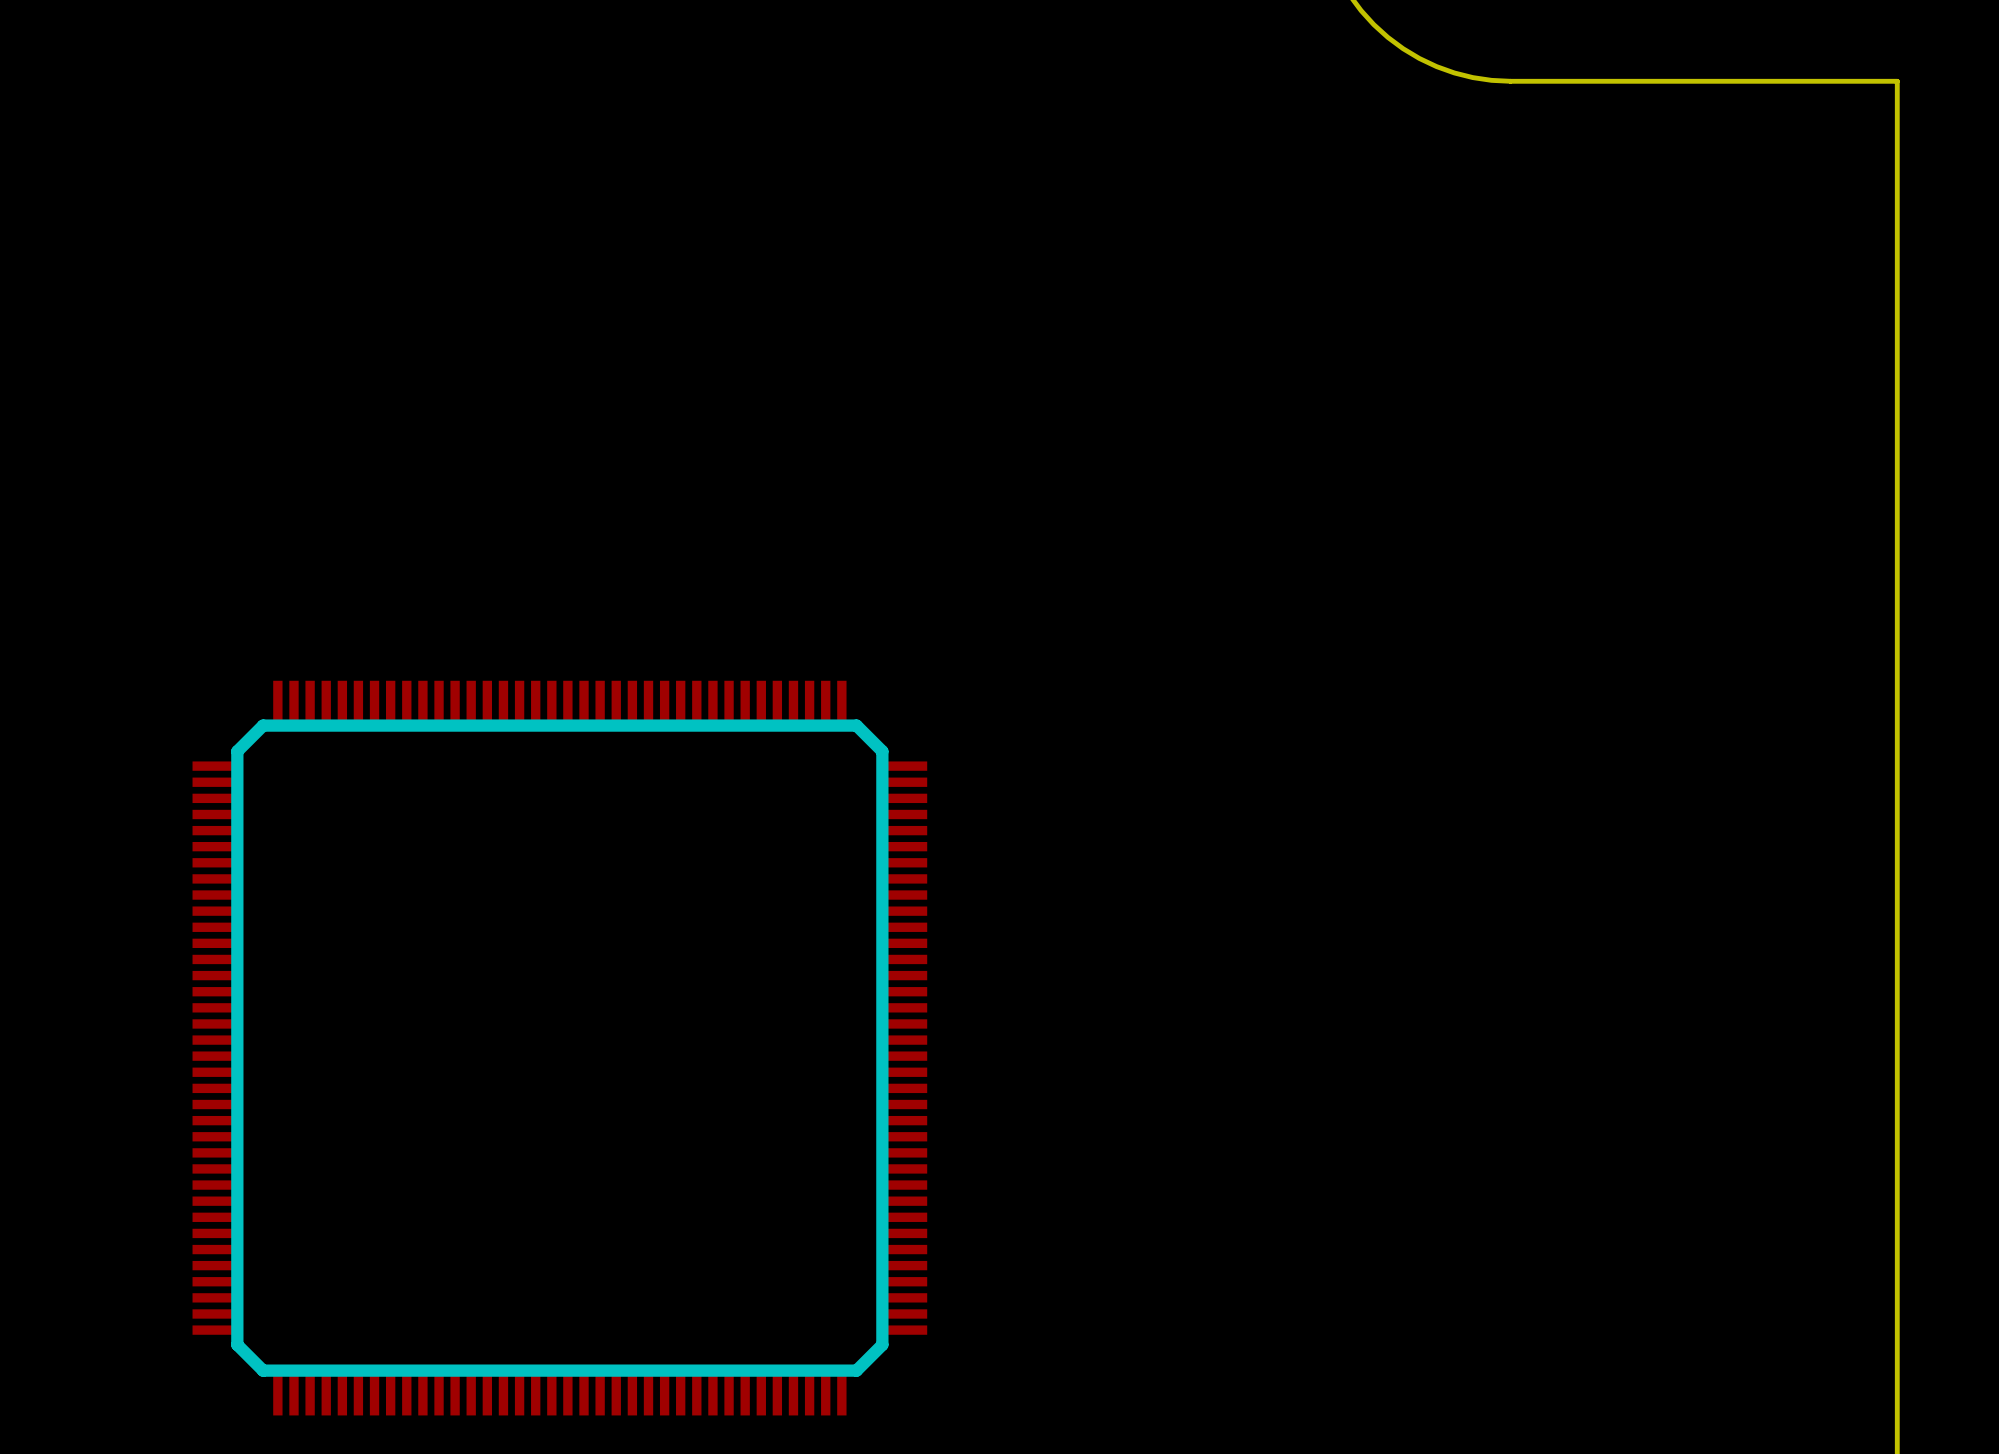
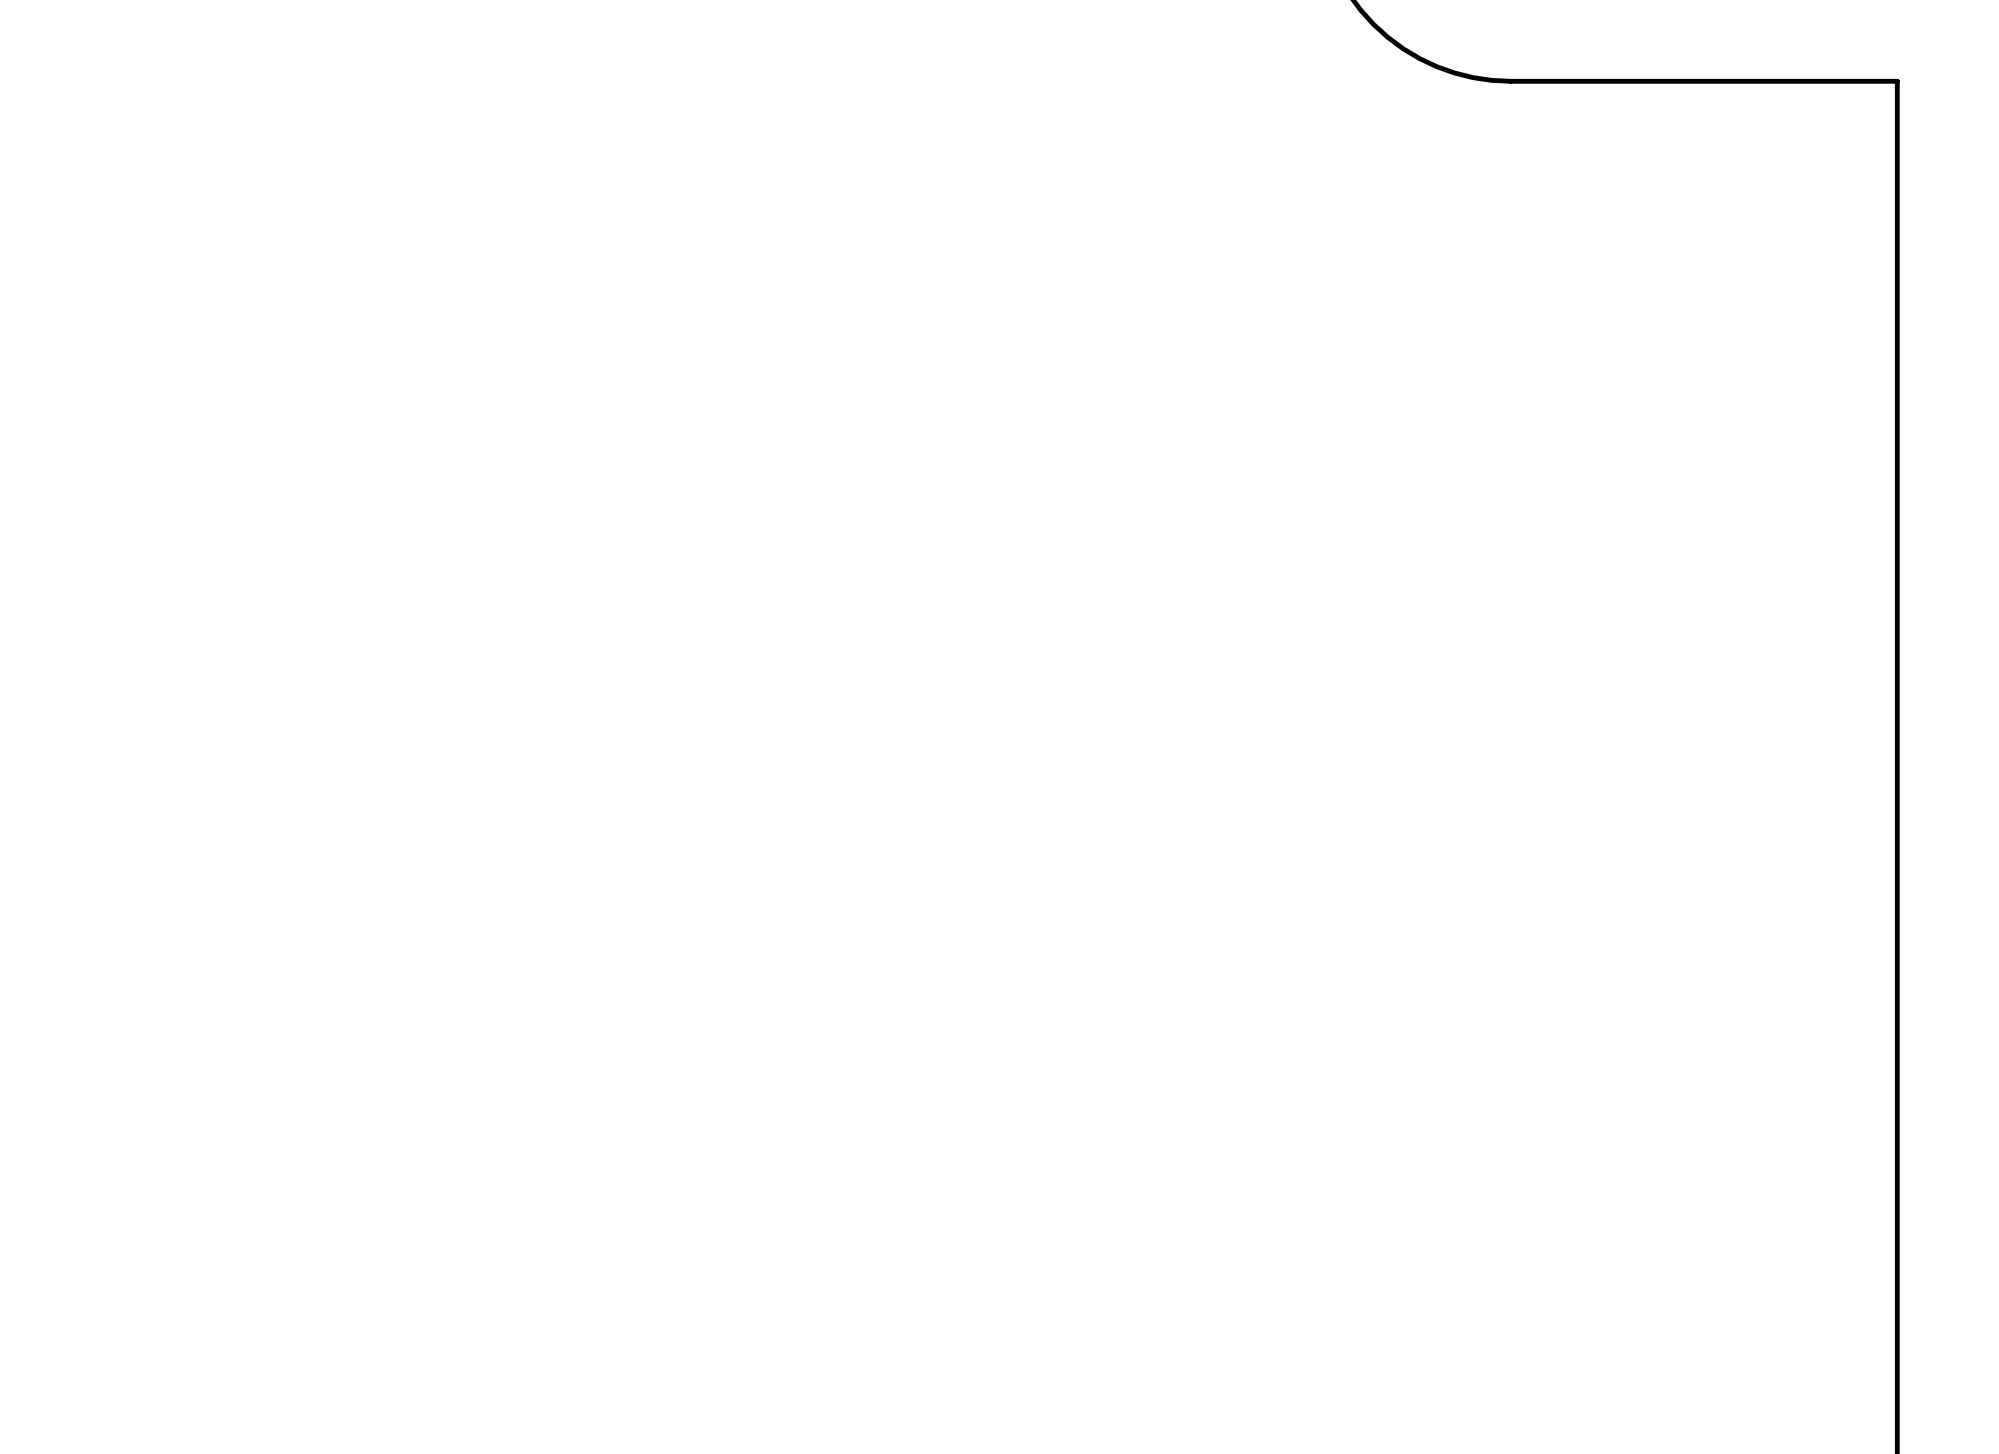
part: (559, 1048) -> none

